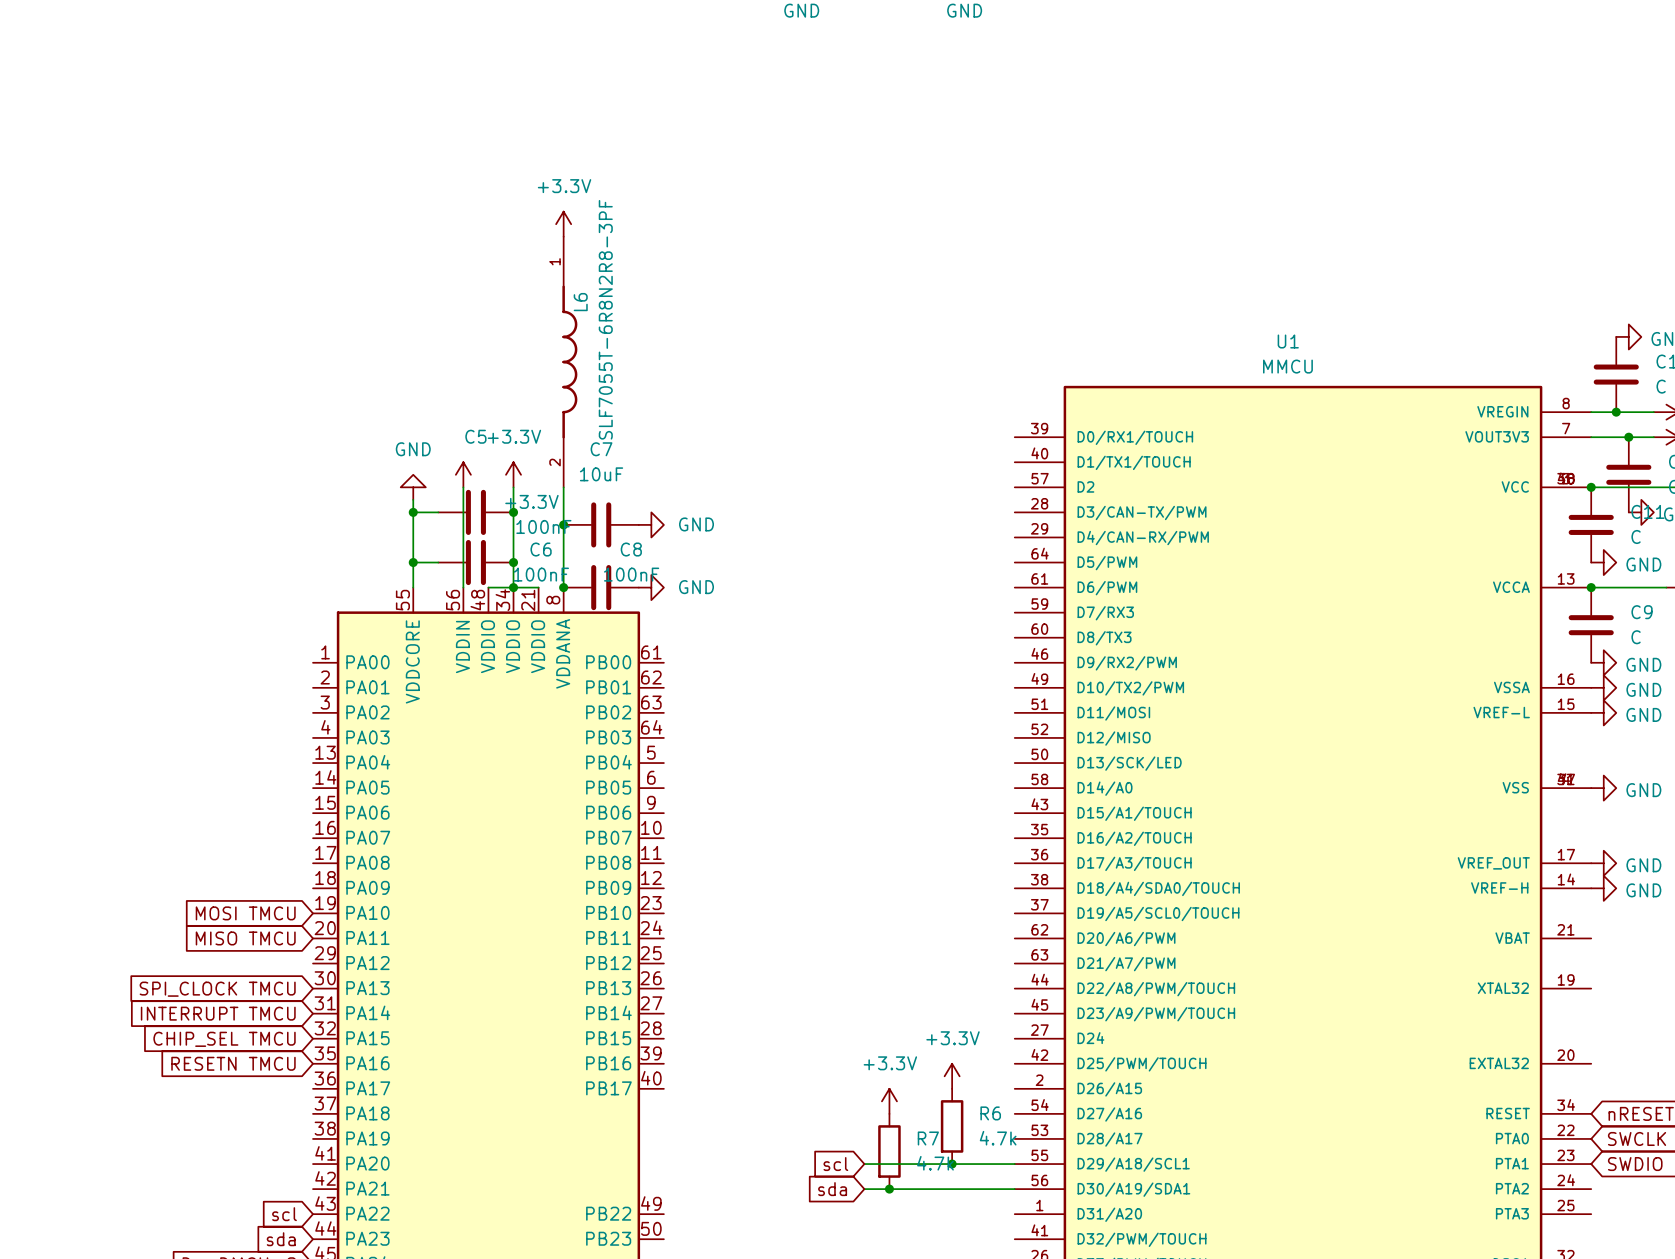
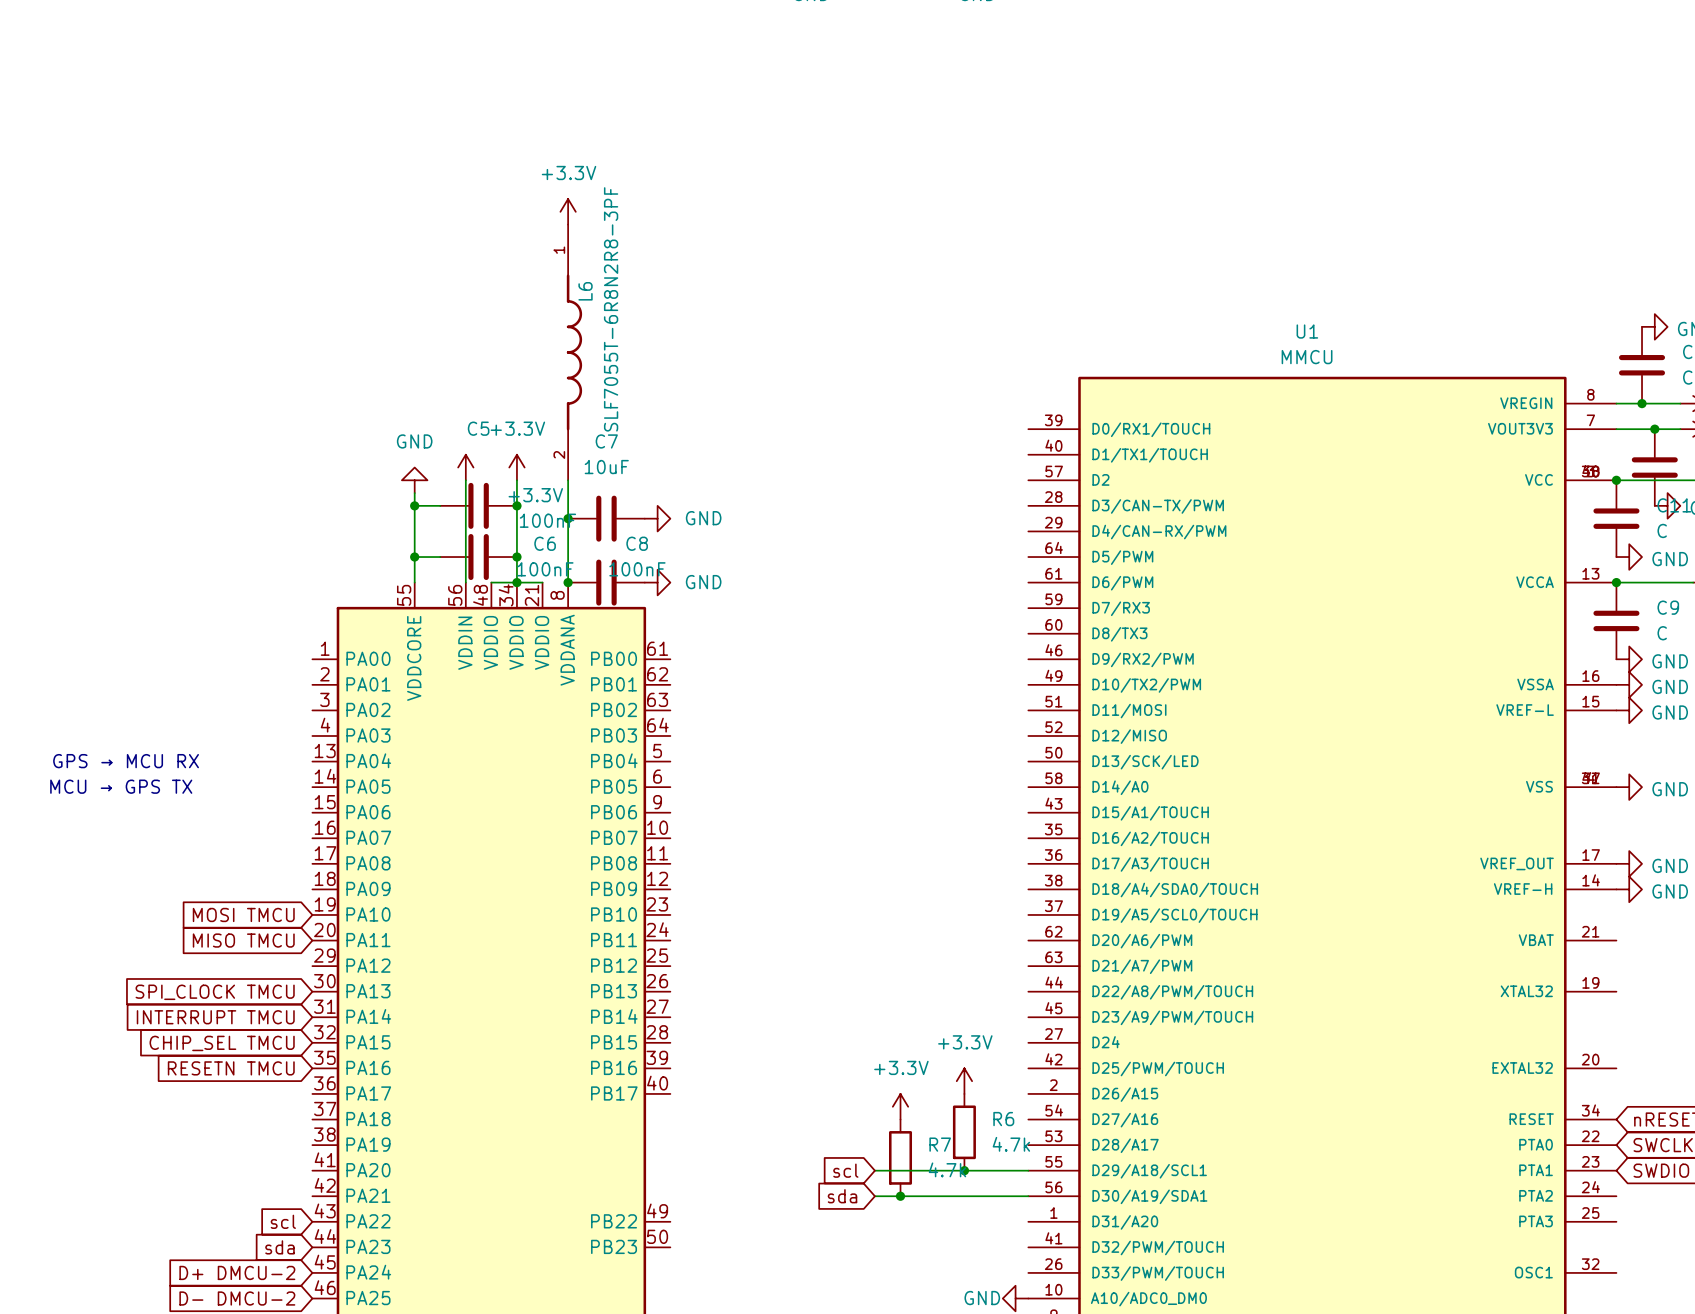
text: none -> GPS → MCU RX (126, 761)
text: none -> MCU → GPS TX (121, 786)

